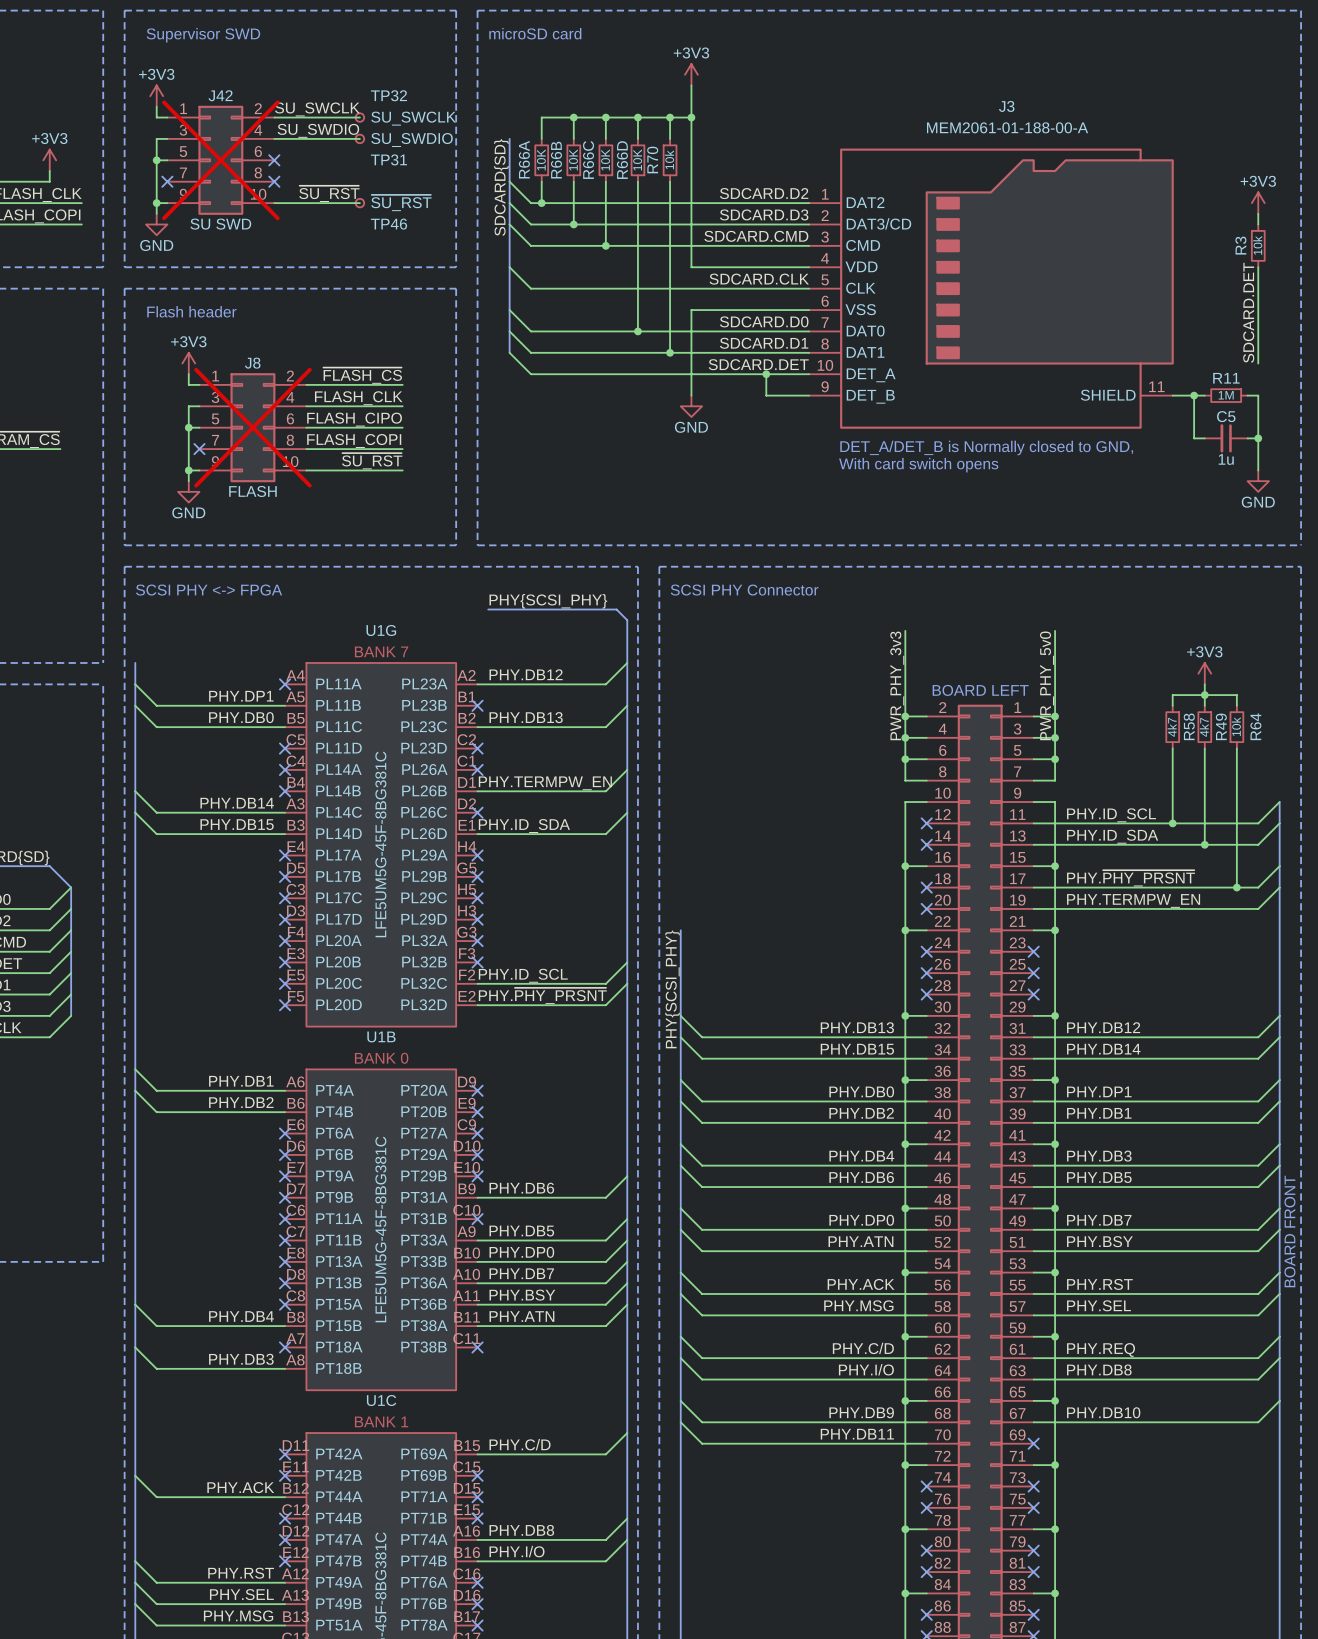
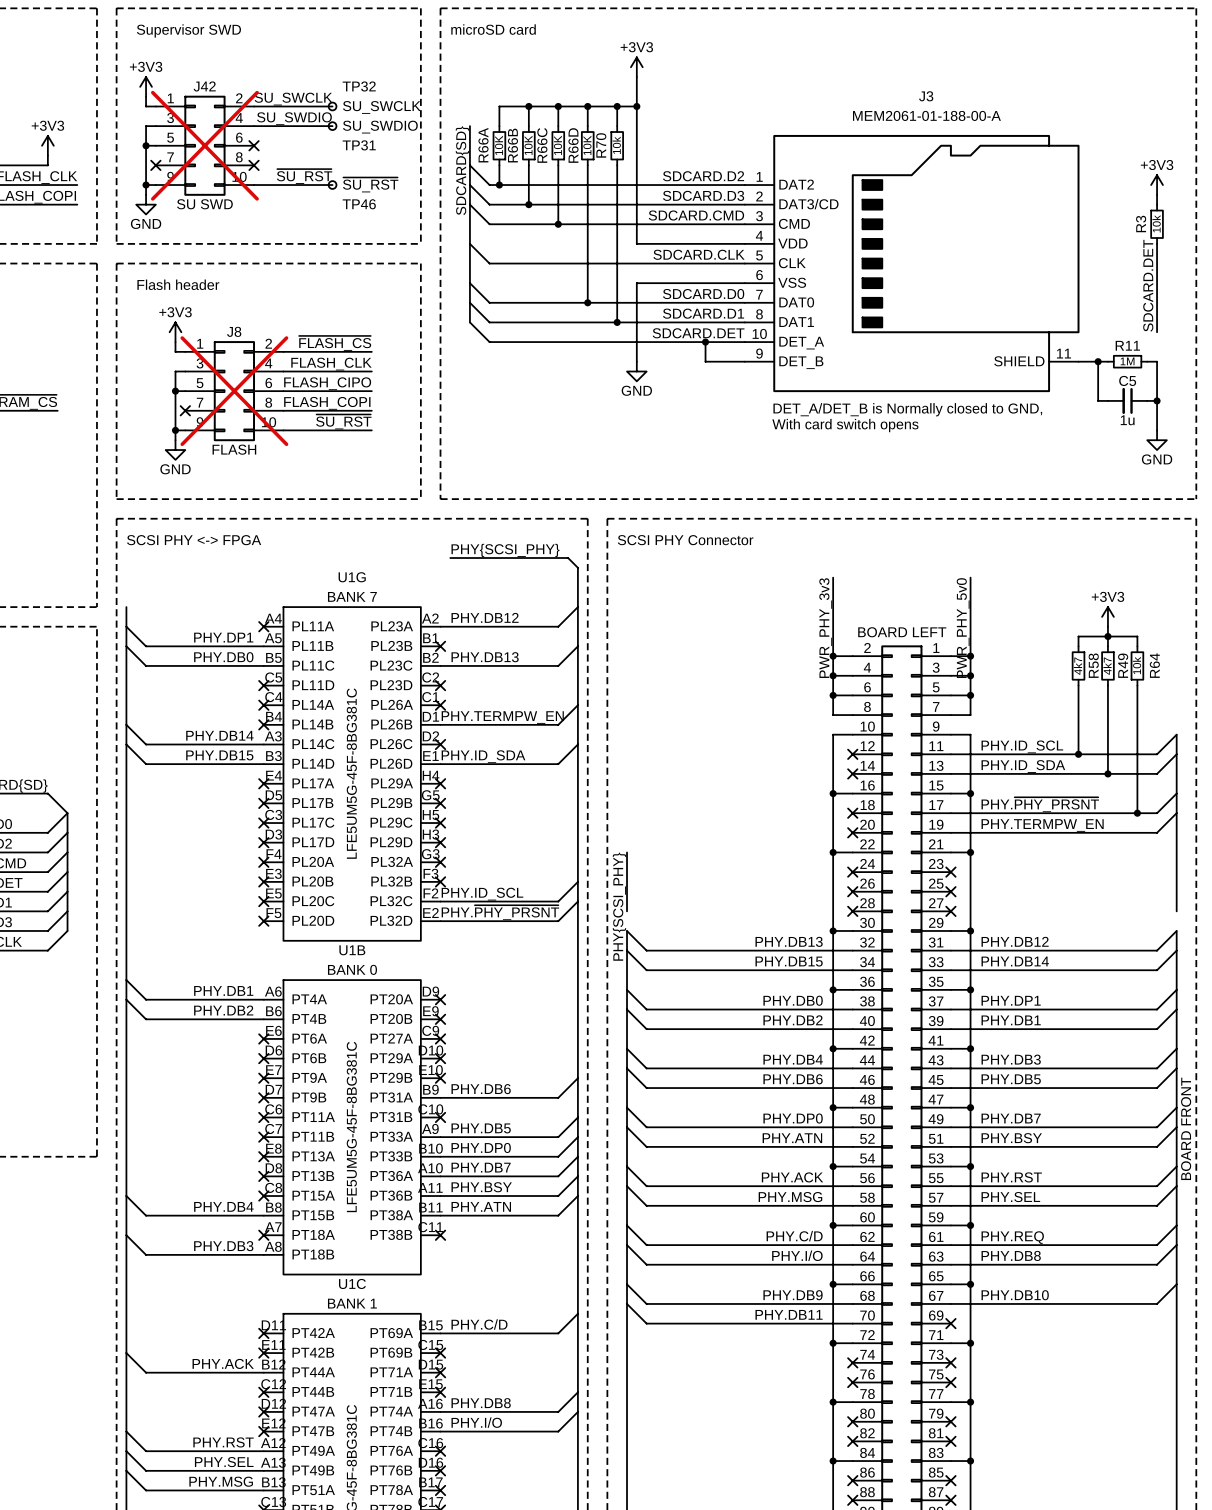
bus: (680, 994) (680, 1015) -> none
bus: (1279, 994) (1279, 1015) -> none

